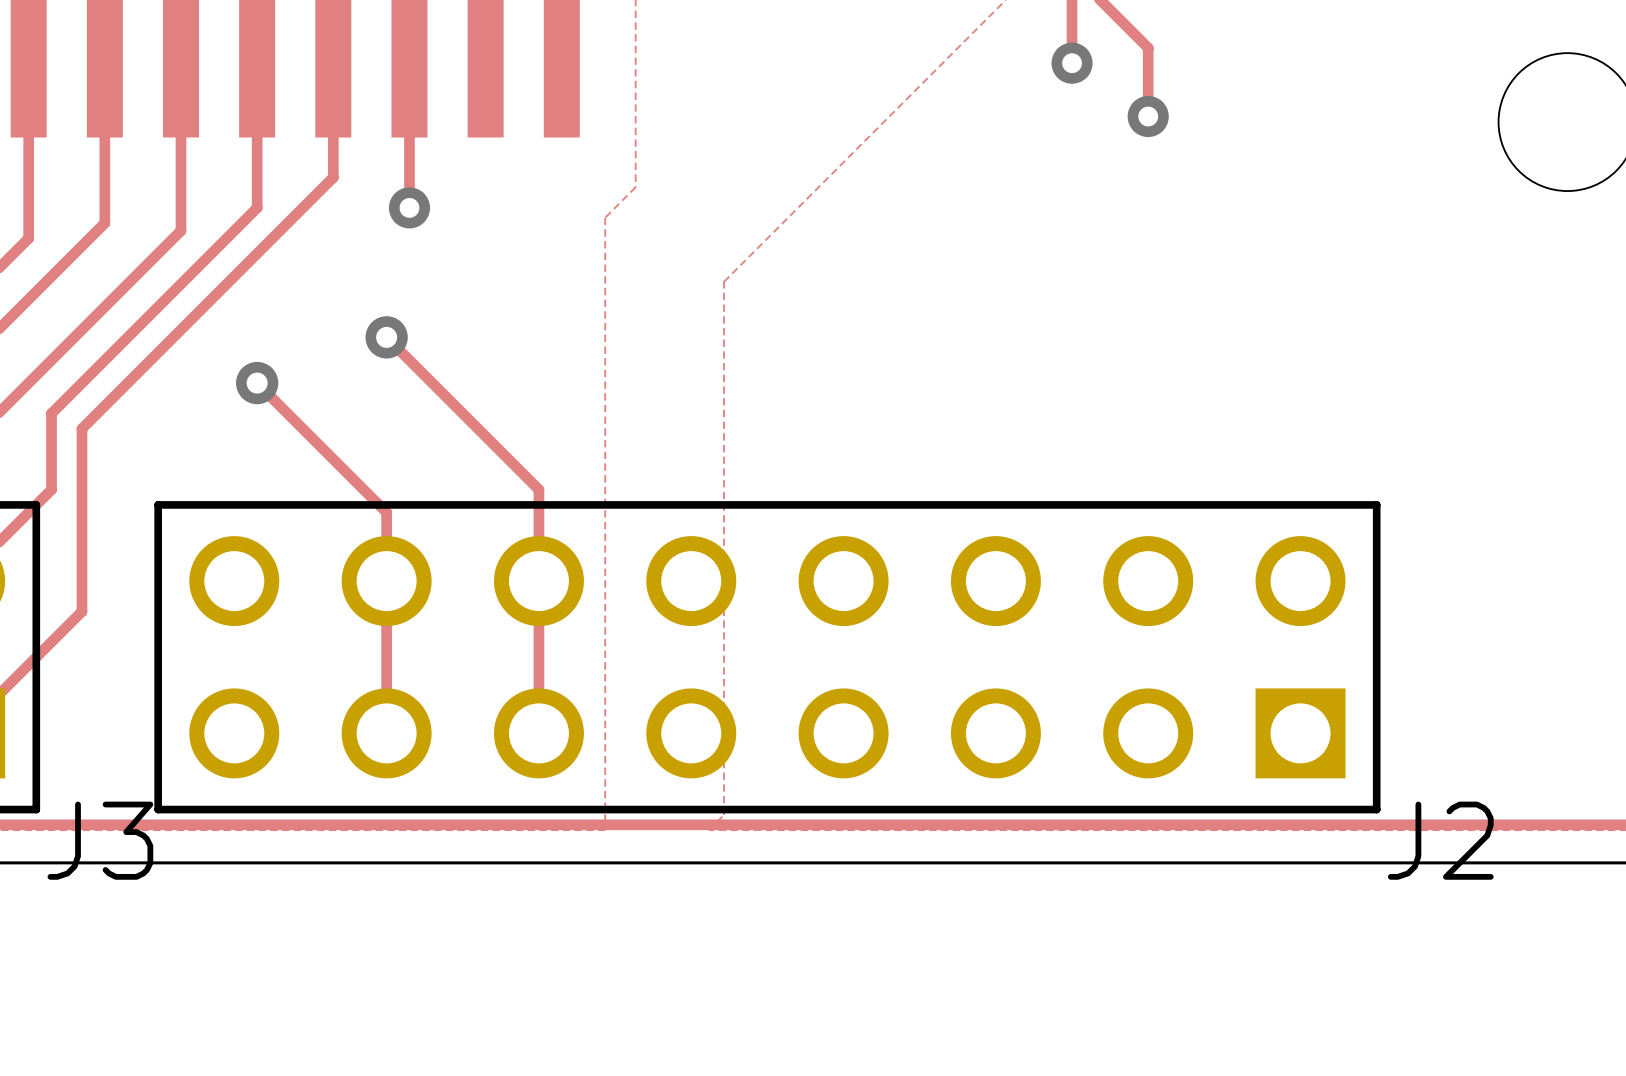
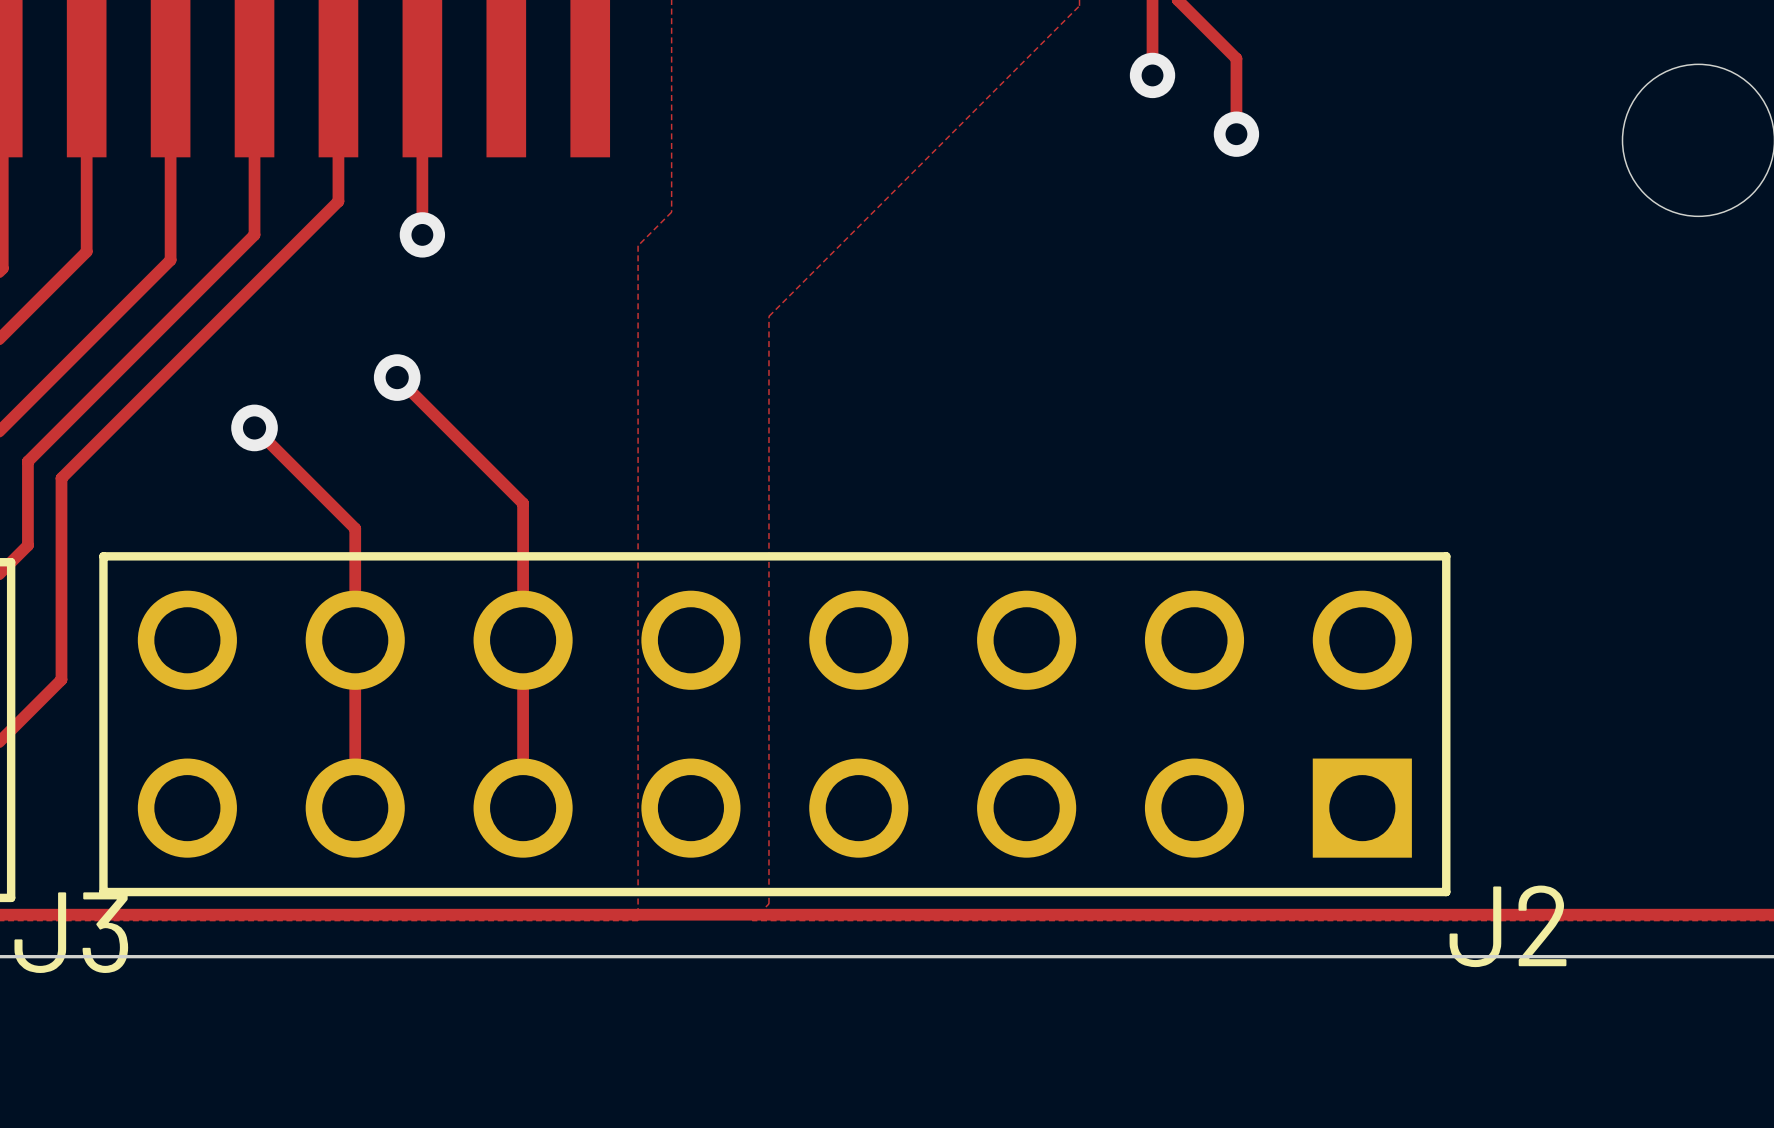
track: (500, 451) (538, 489) (538, 733) -> (523, 503) (523, 808)
track: (348, 474) (386, 512) (386, 733) -> (355, 528) (355, 808)
J2 position: (767, 657) -> (774, 724)

